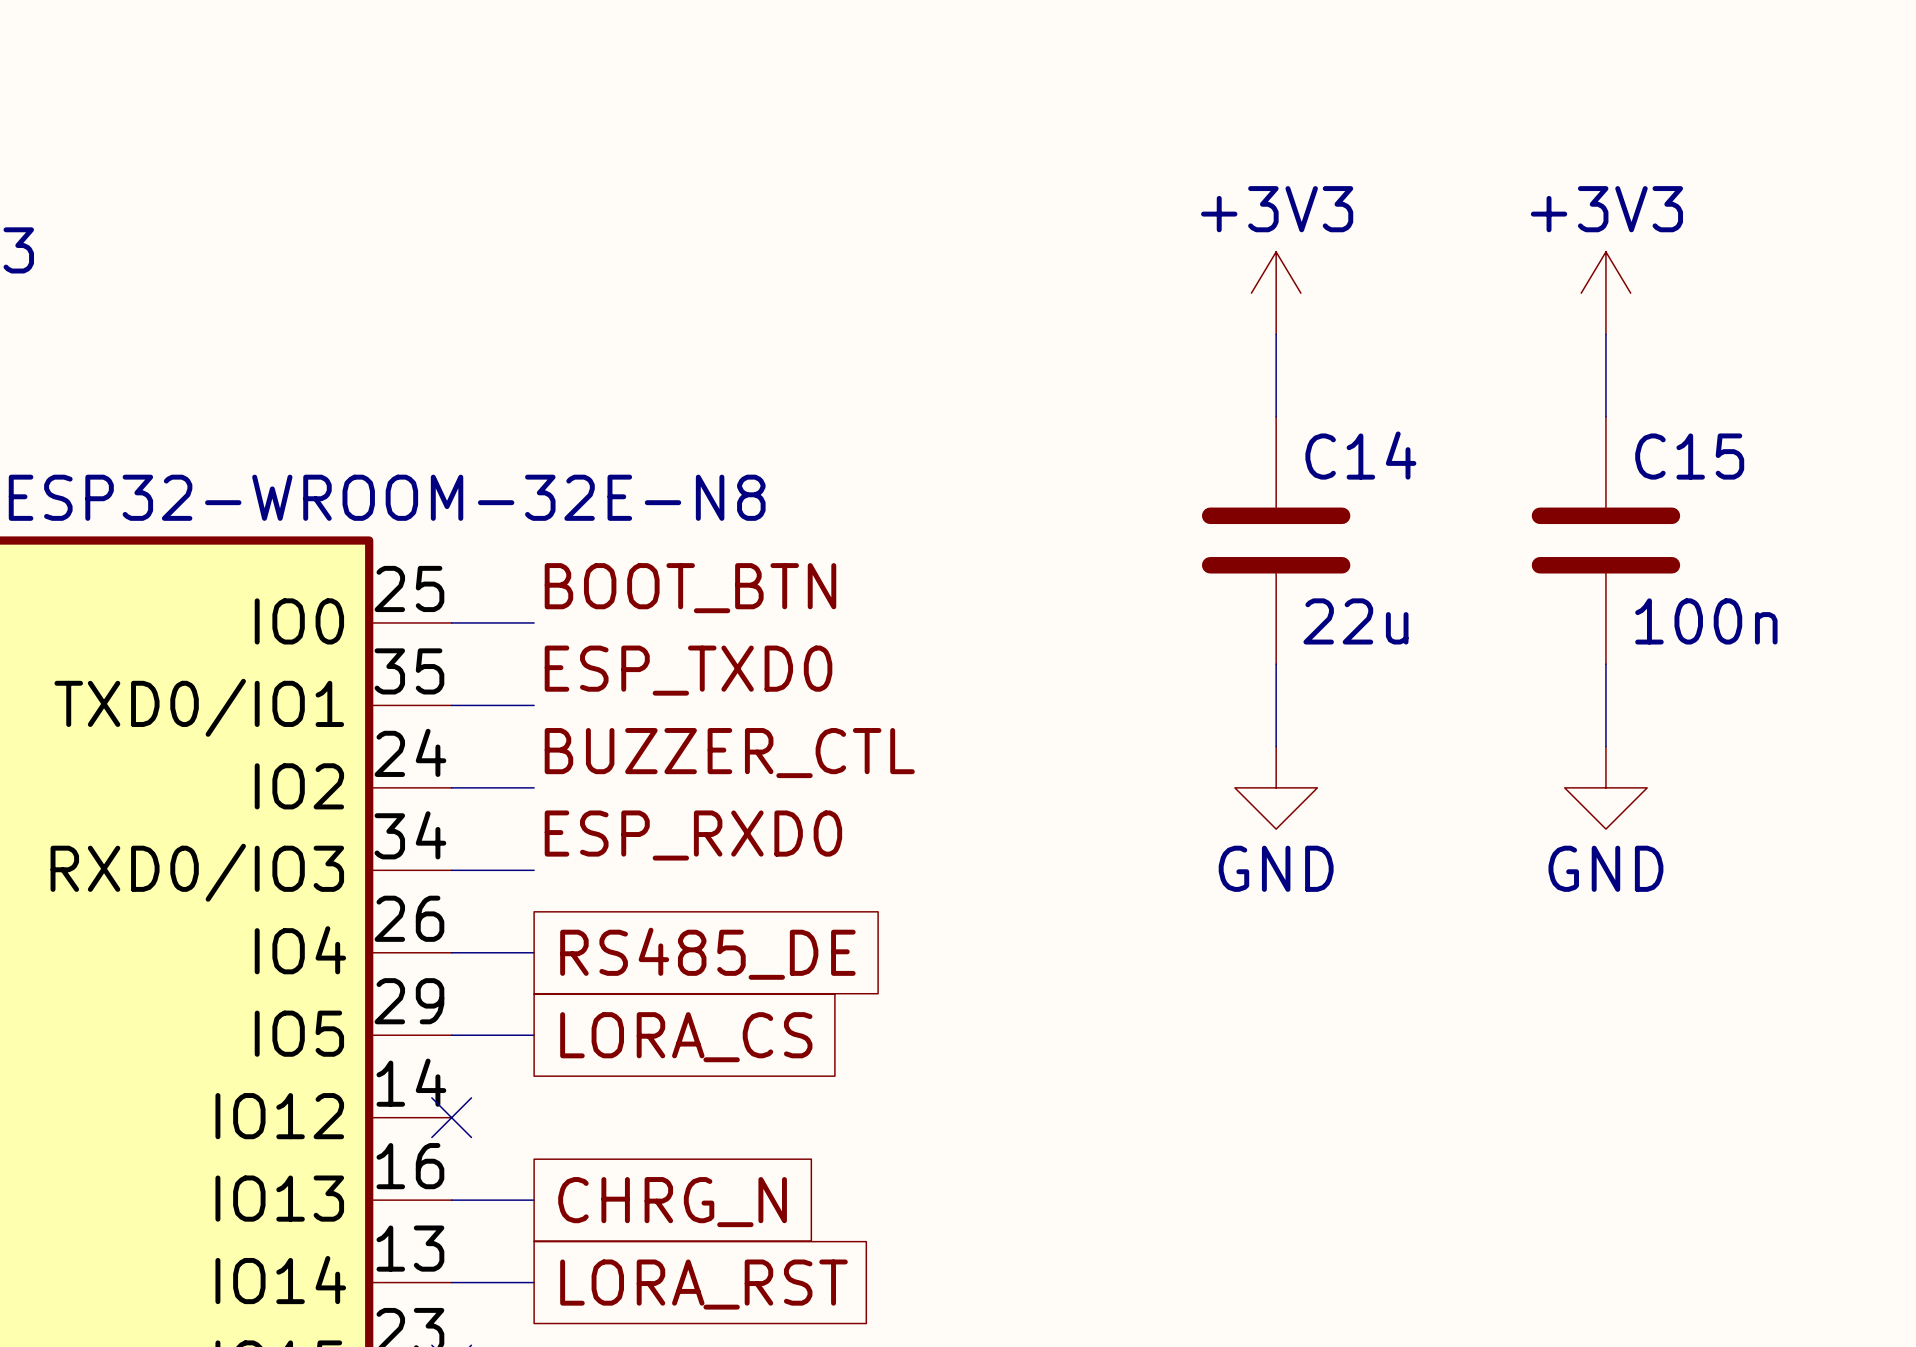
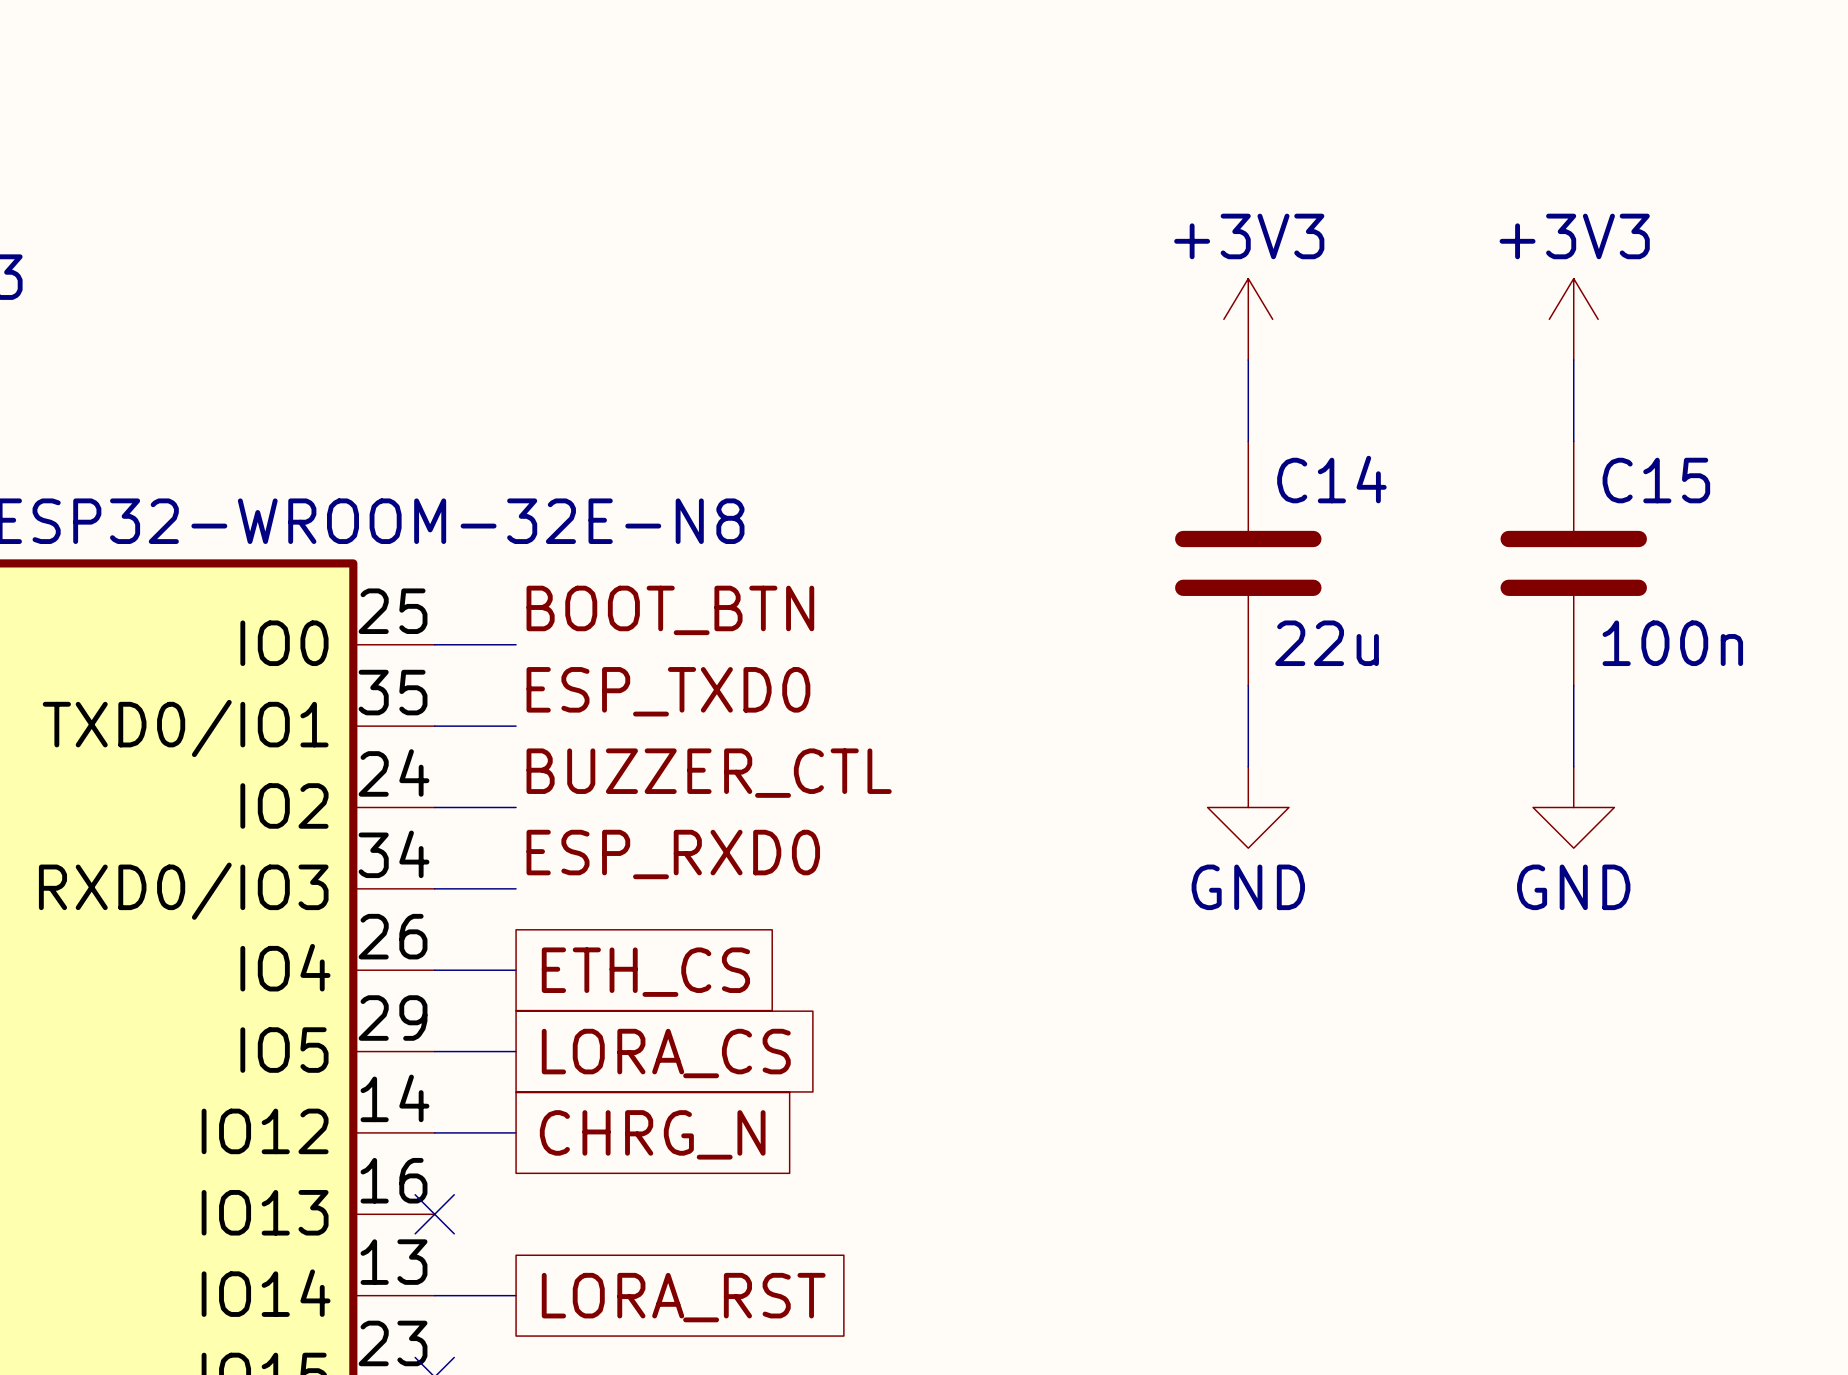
global label: RS485_DE (707, 953) -> ETH_CS (645, 972)
no-connect mark position: (451, 1117) -> (434, 1214)
wire: (451, 1200) (534, 1200) -> (434, 1132) (516, 1132)
global label position: CHRG_N (672, 1202) -> CHRG_N (652, 1134)

